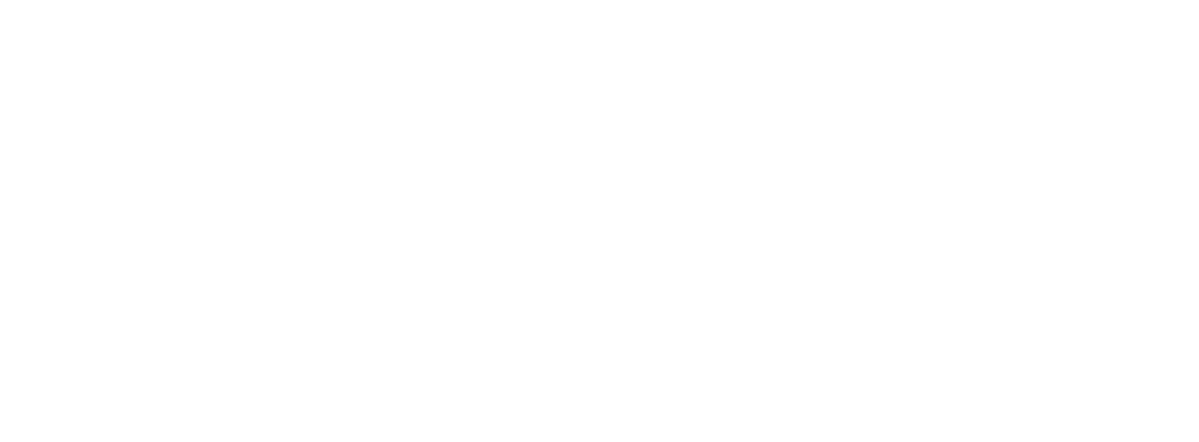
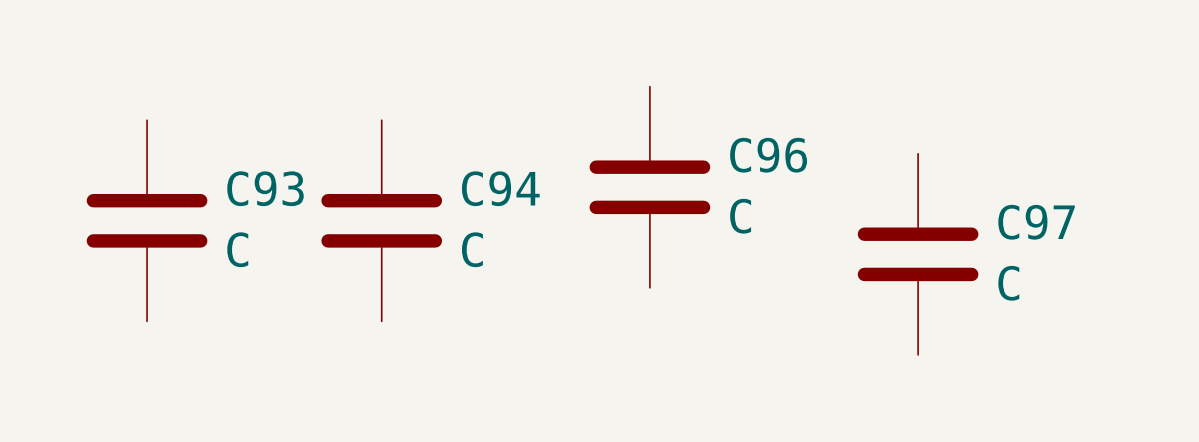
C96: none -> C (649, 187)
C93: none -> C (147, 220)
C94: none -> C (381, 220)
C97: none -> C (918, 254)

